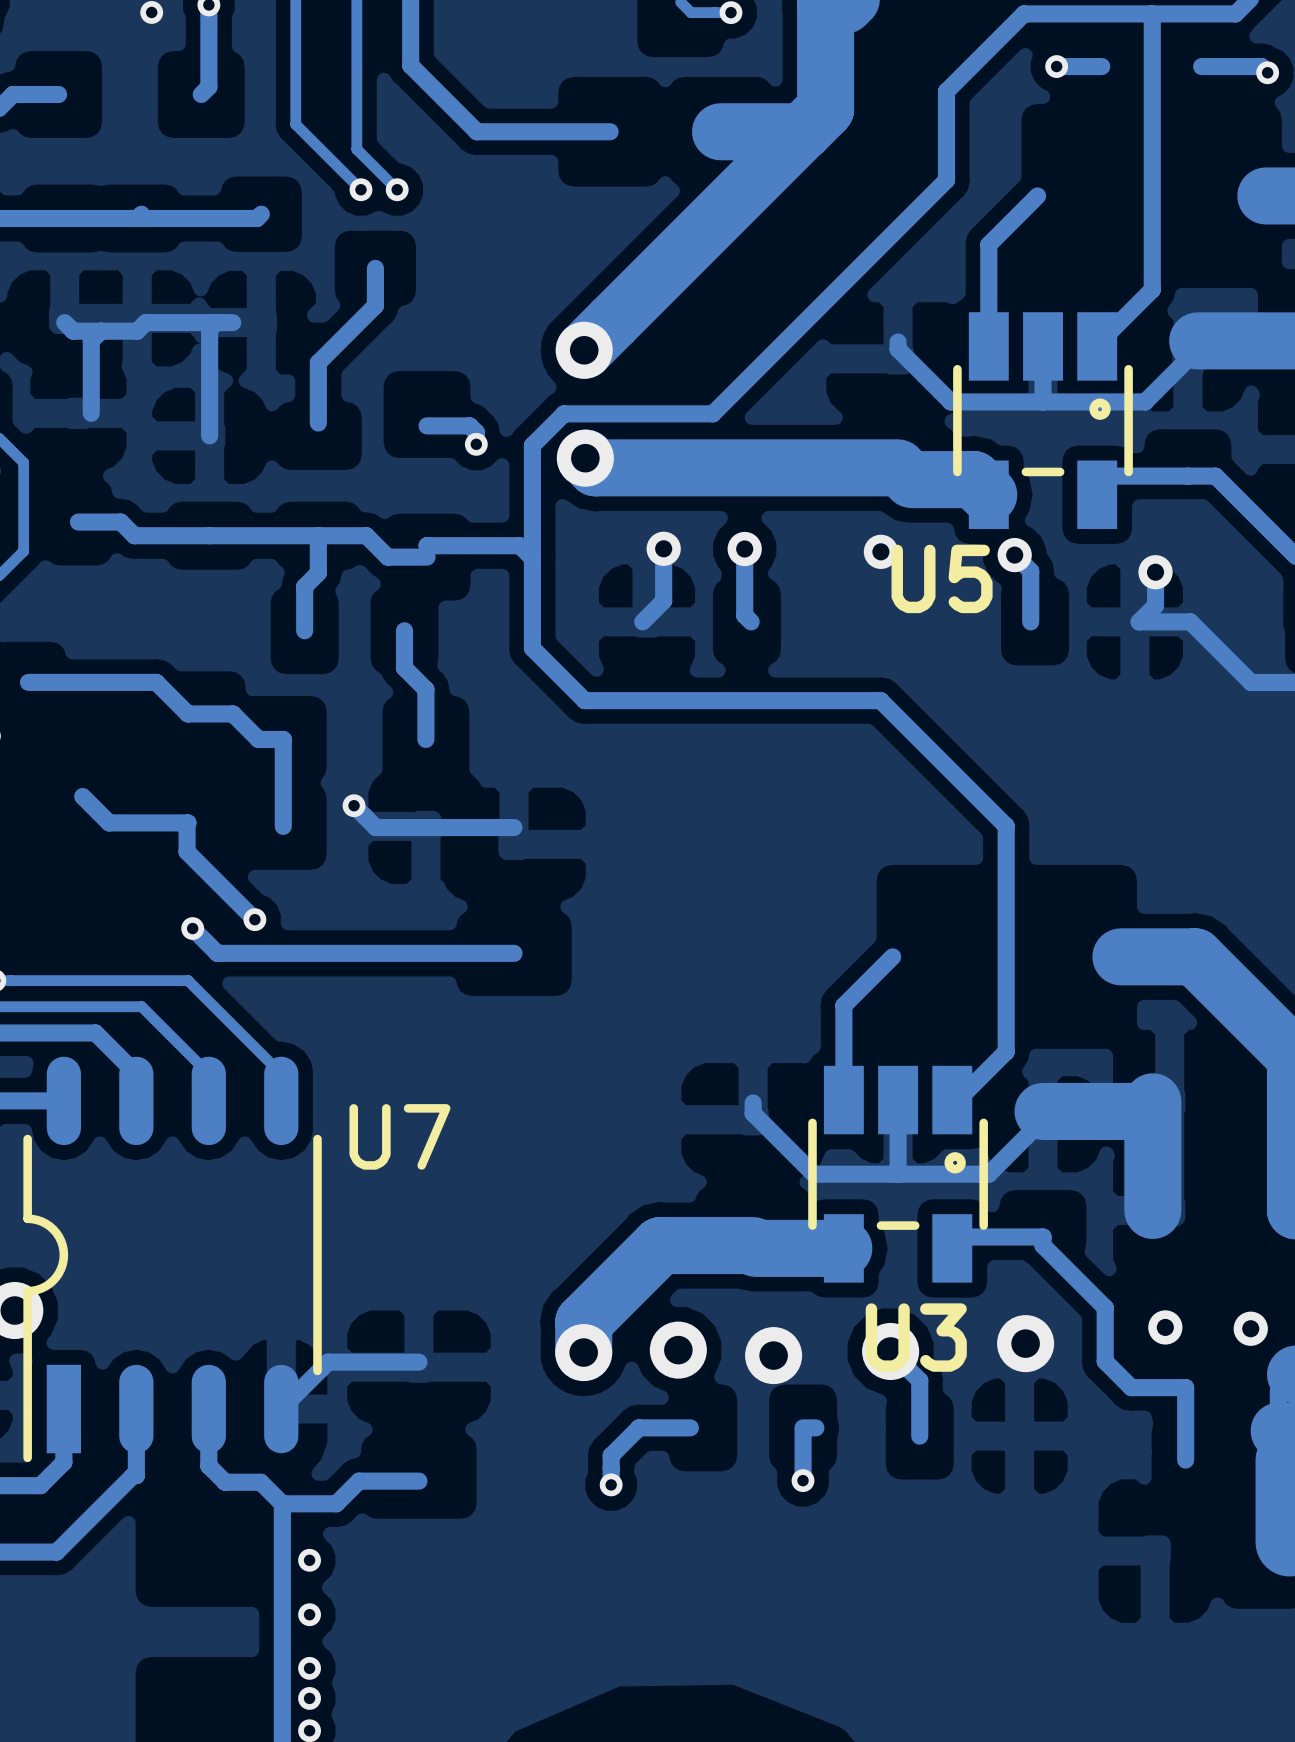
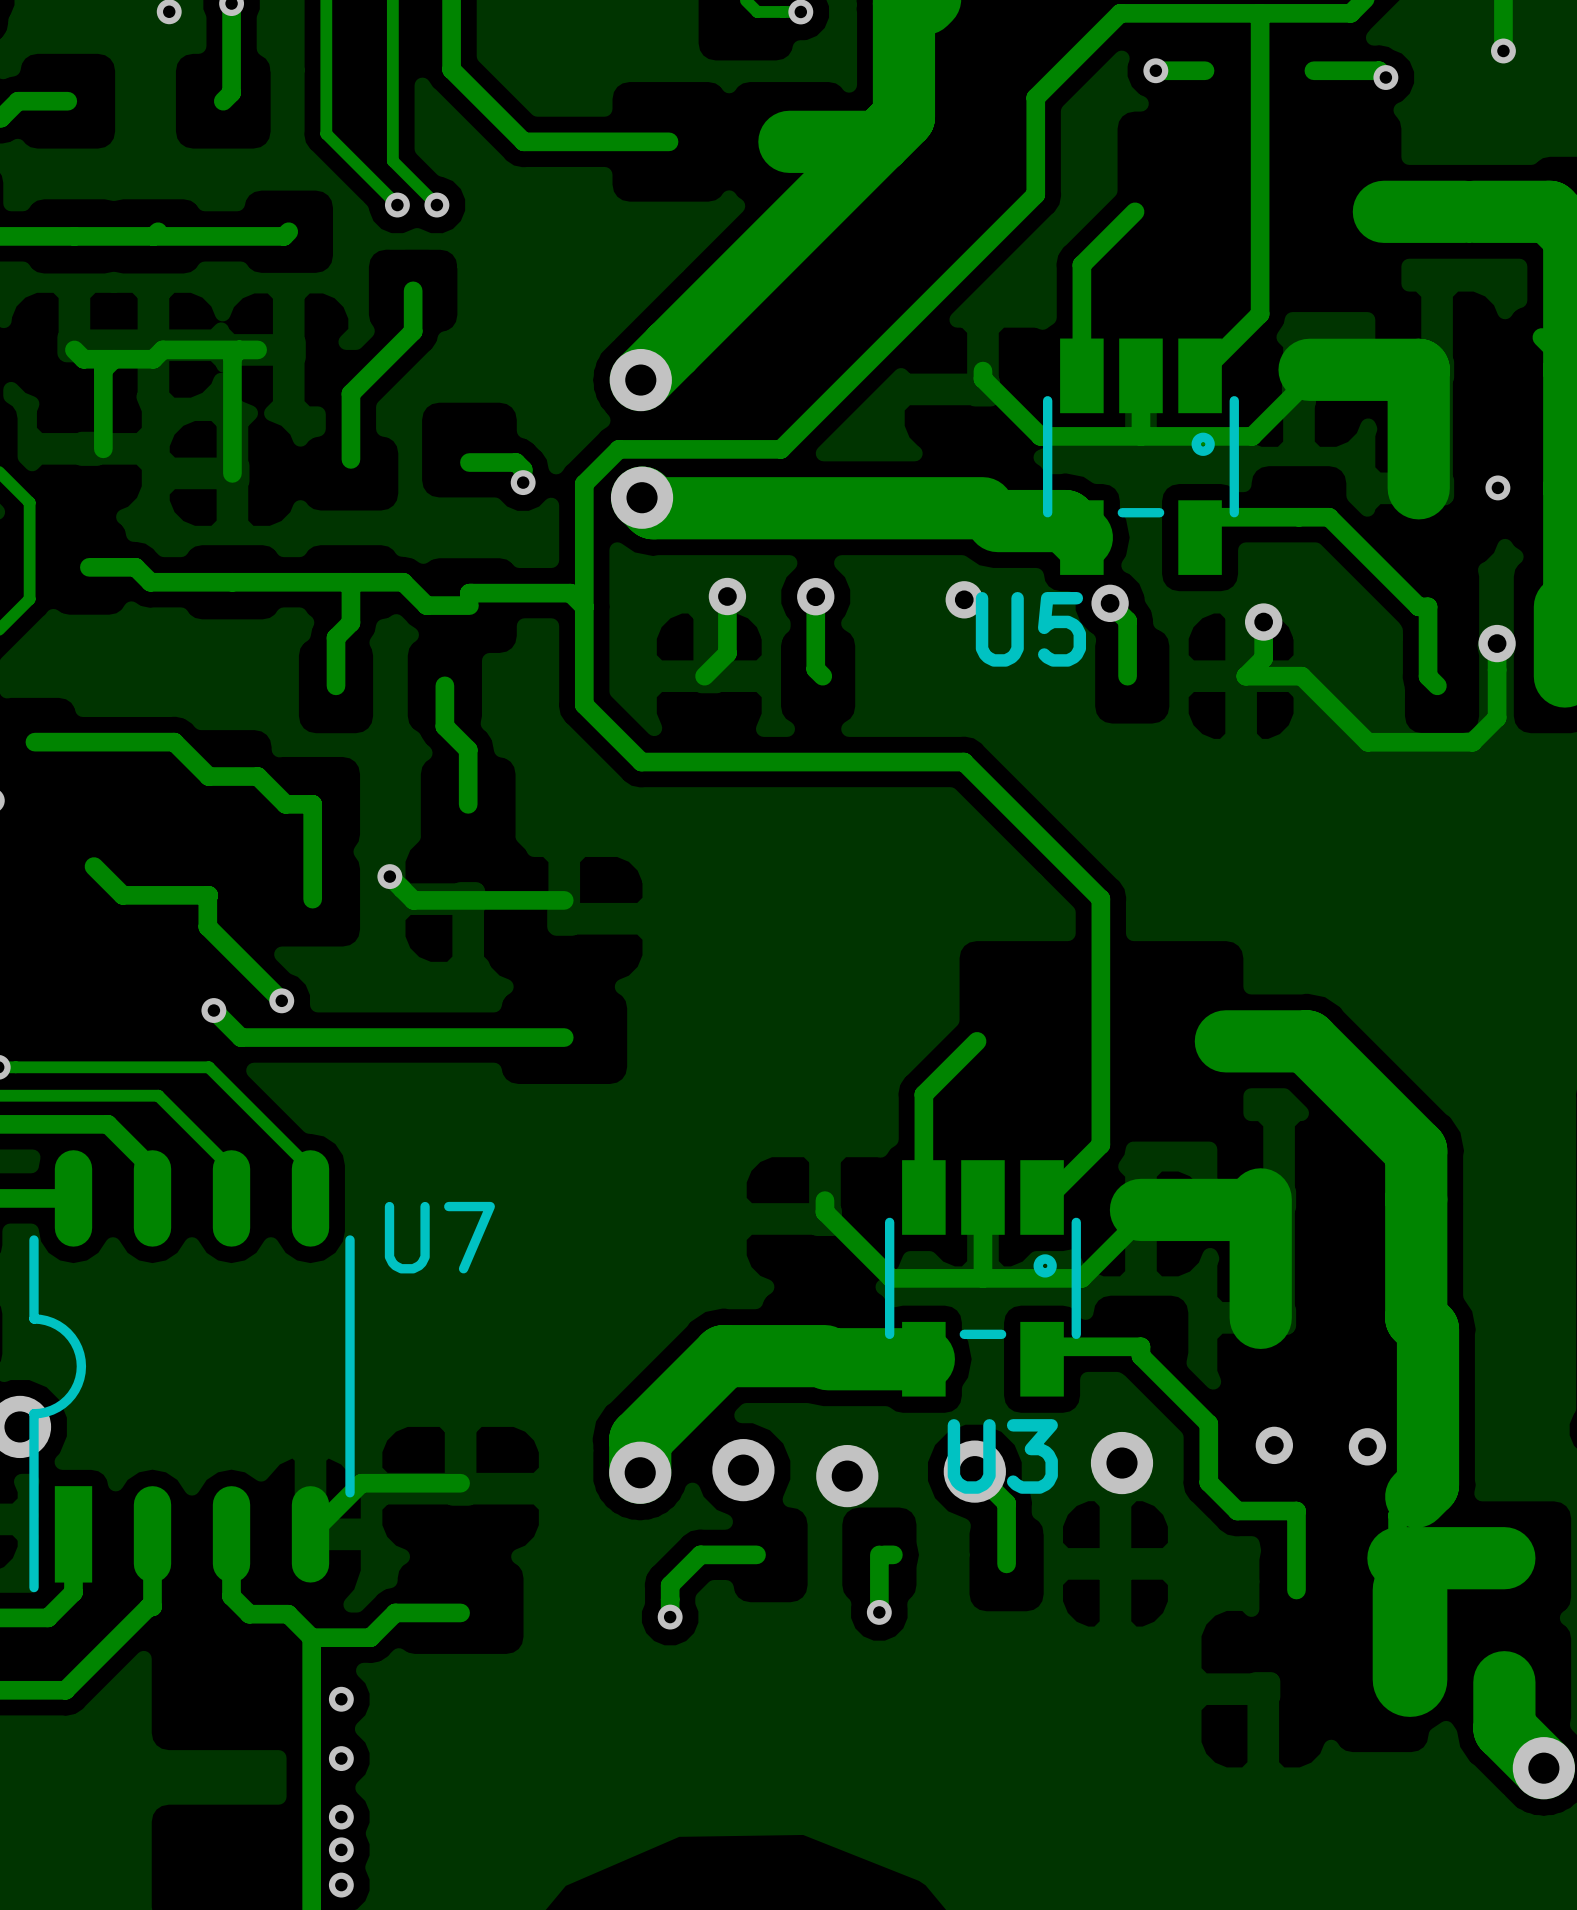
U7 footprint: [23, 1056, 322, 1463] -> [29, 1150, 355, 1593]

